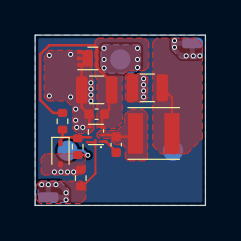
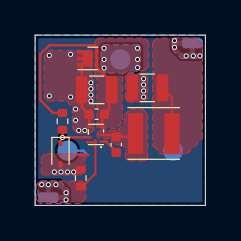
via: (76, 127) -> none
via: (82, 127) -> none
via: none -> (78, 130)
via: none -> (84, 130)
via: none -> (62, 137)
part: (77, 146) -> none
via: (87, 155) -> none

